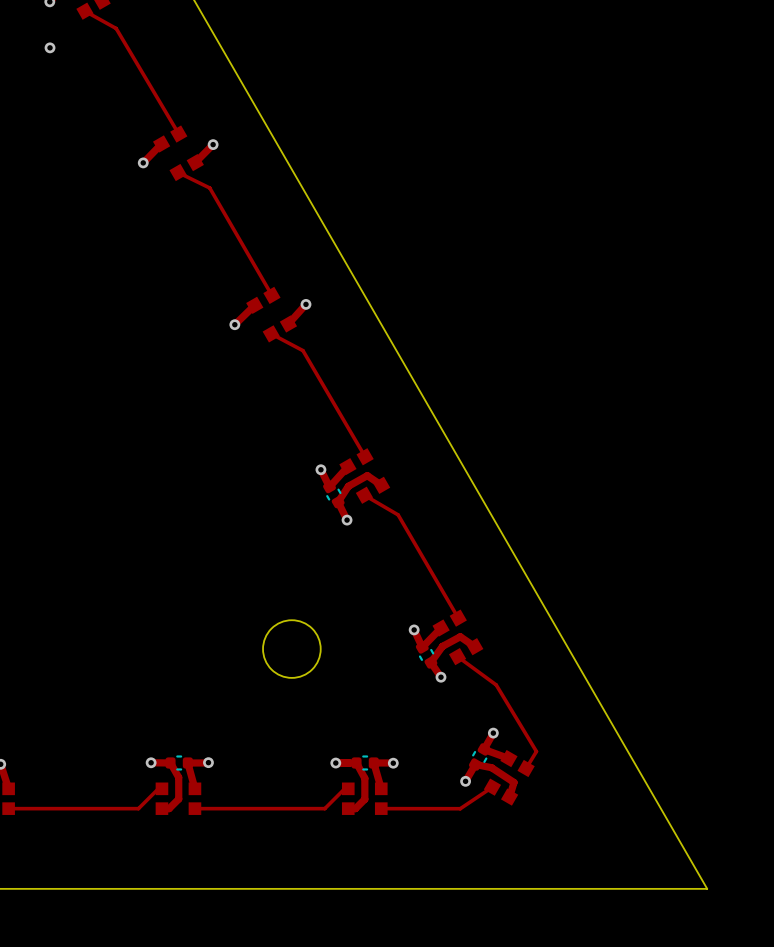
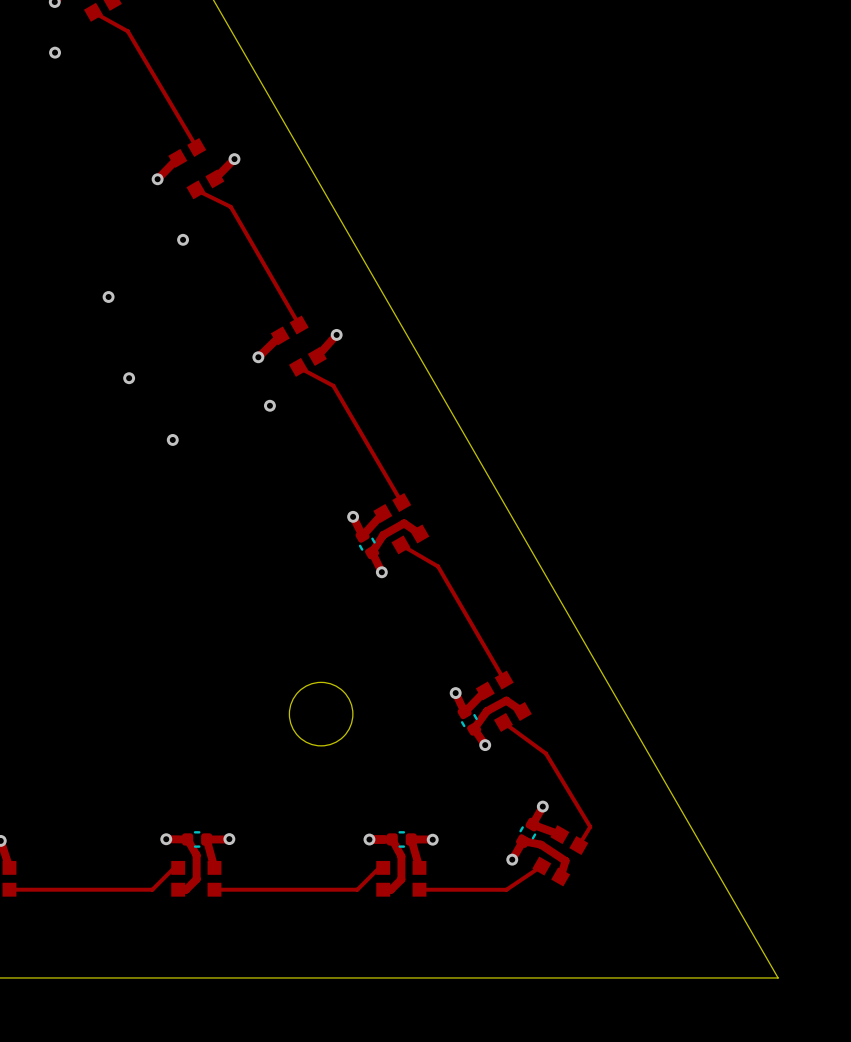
via: none -> (183, 239)
via: none -> (108, 296)
via: none -> (129, 378)
via: none -> (269, 405)
via: none -> (172, 439)

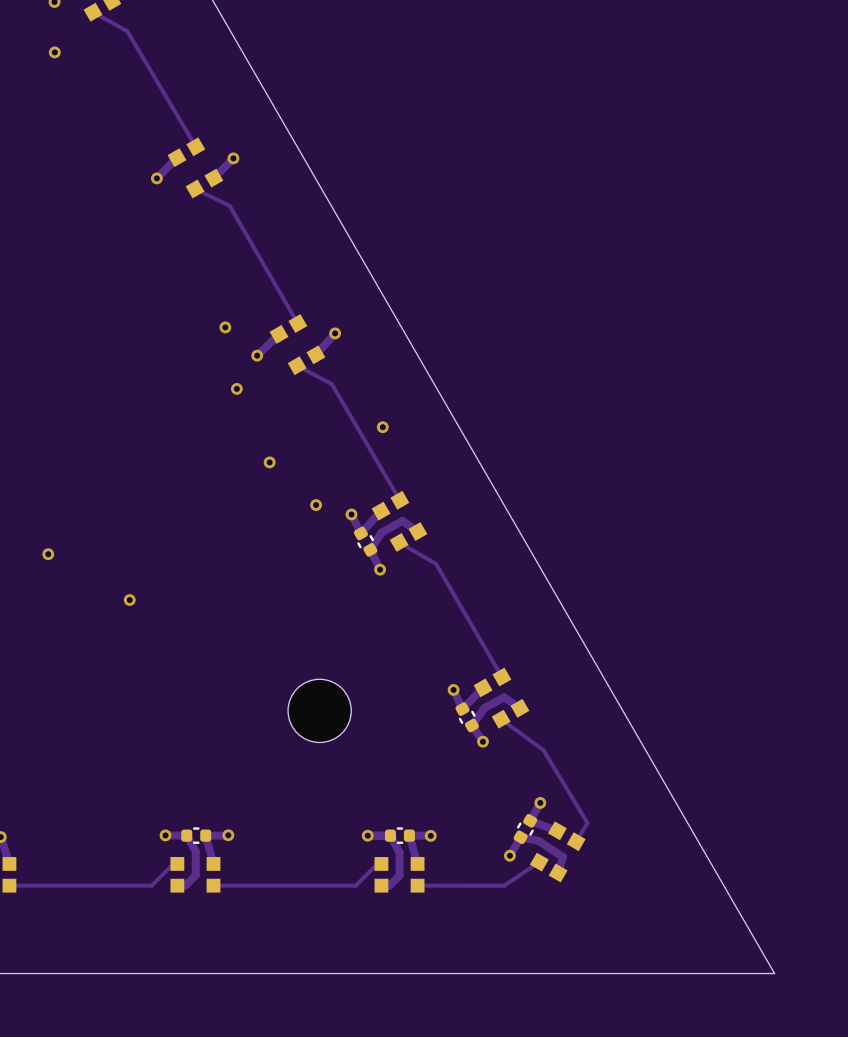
via: (183, 239) -> none
via: (108, 296) -> none
via: none -> (225, 327)
via: (129, 378) -> none
via: none -> (236, 388)
via: (269, 405) -> none
via: none -> (382, 427)
via: (172, 439) -> none
via: none -> (269, 462)
via: none -> (316, 505)
via: none -> (48, 554)
via: none -> (129, 600)

